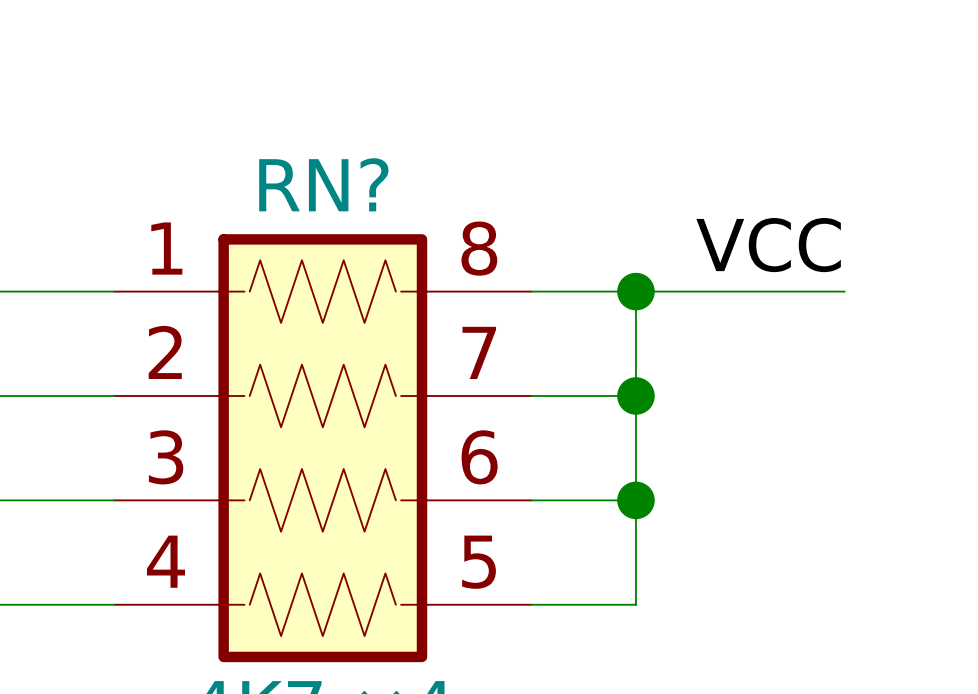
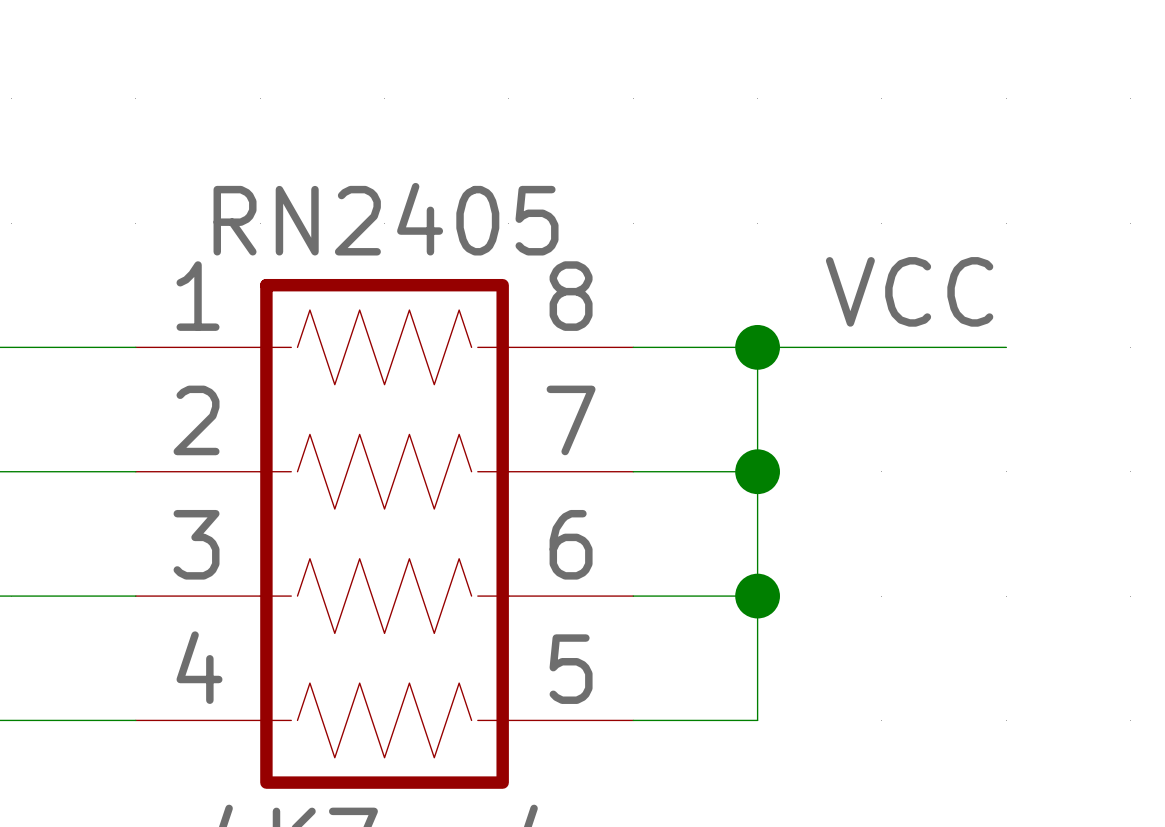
RN? name: RN? (323, 184) -> RN2405 (386, 219)

